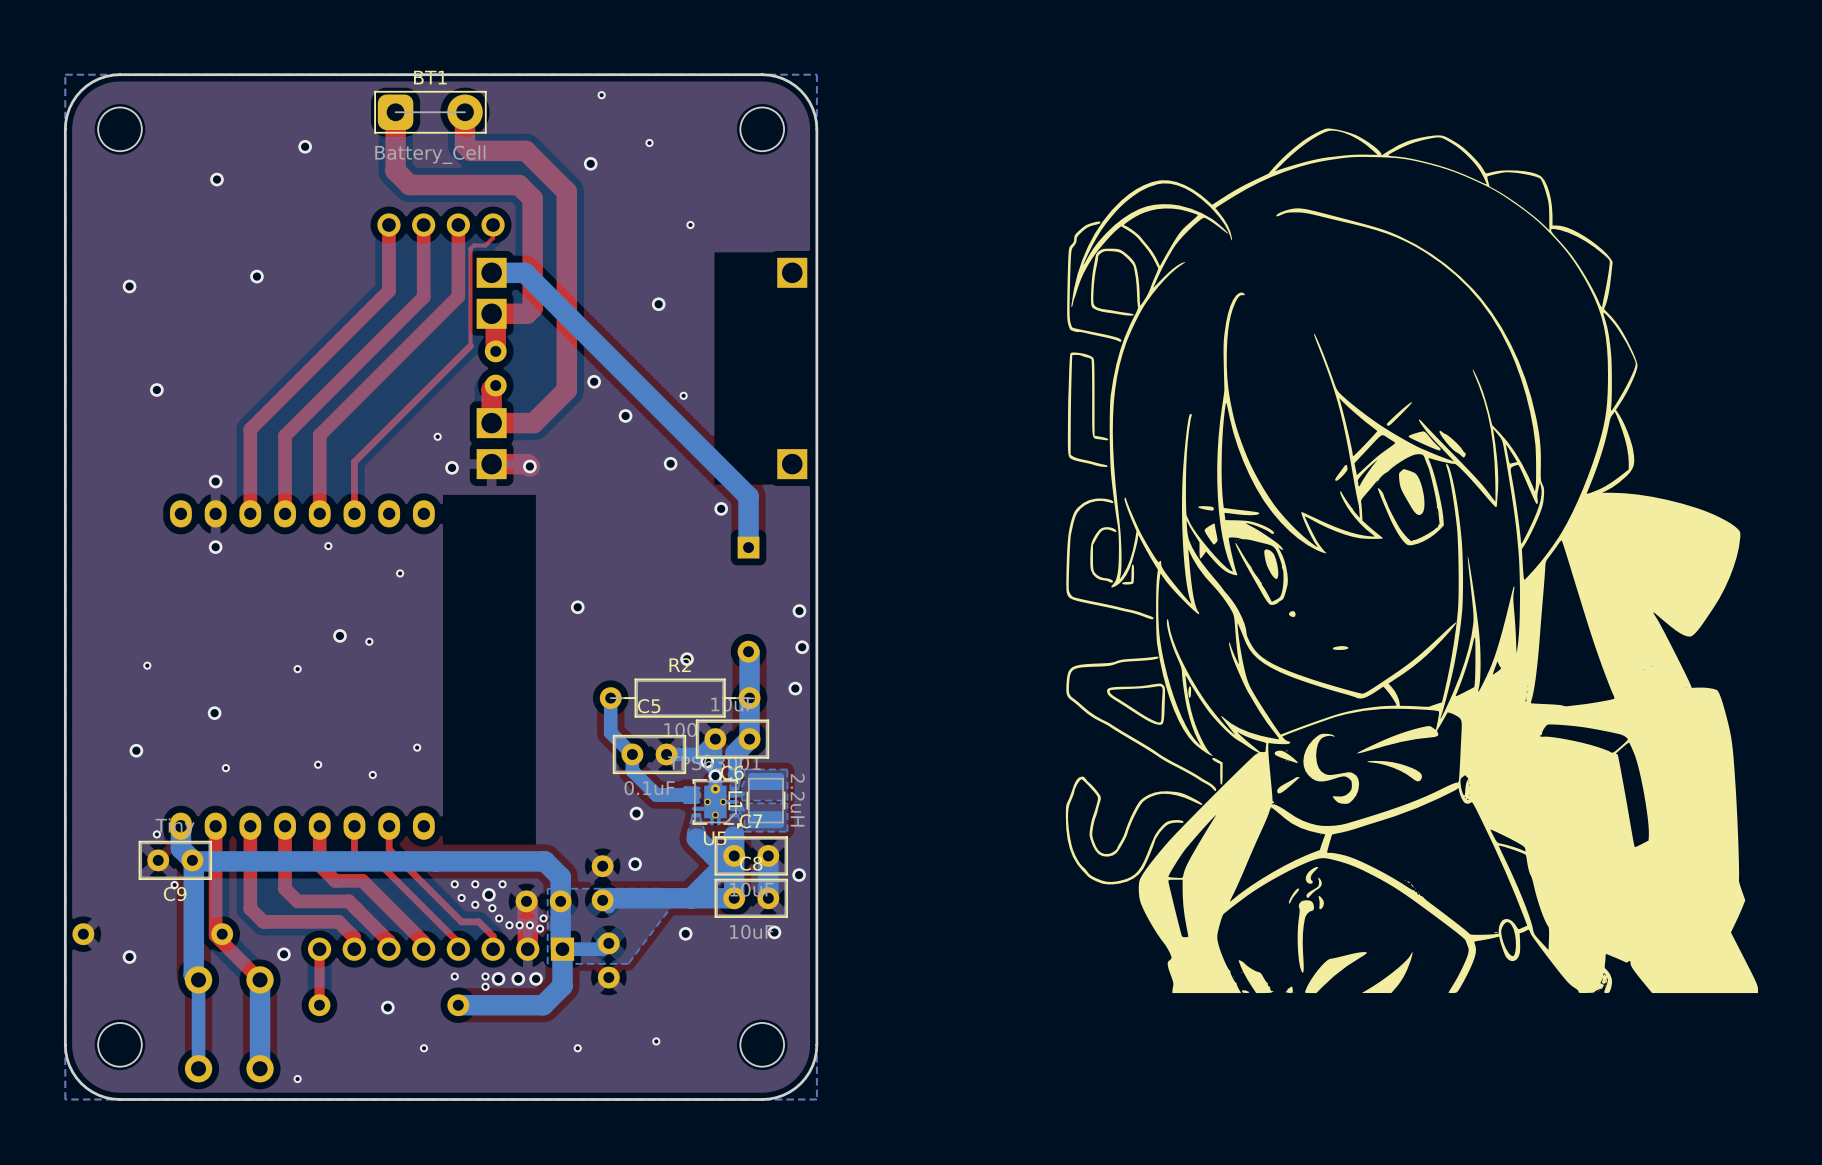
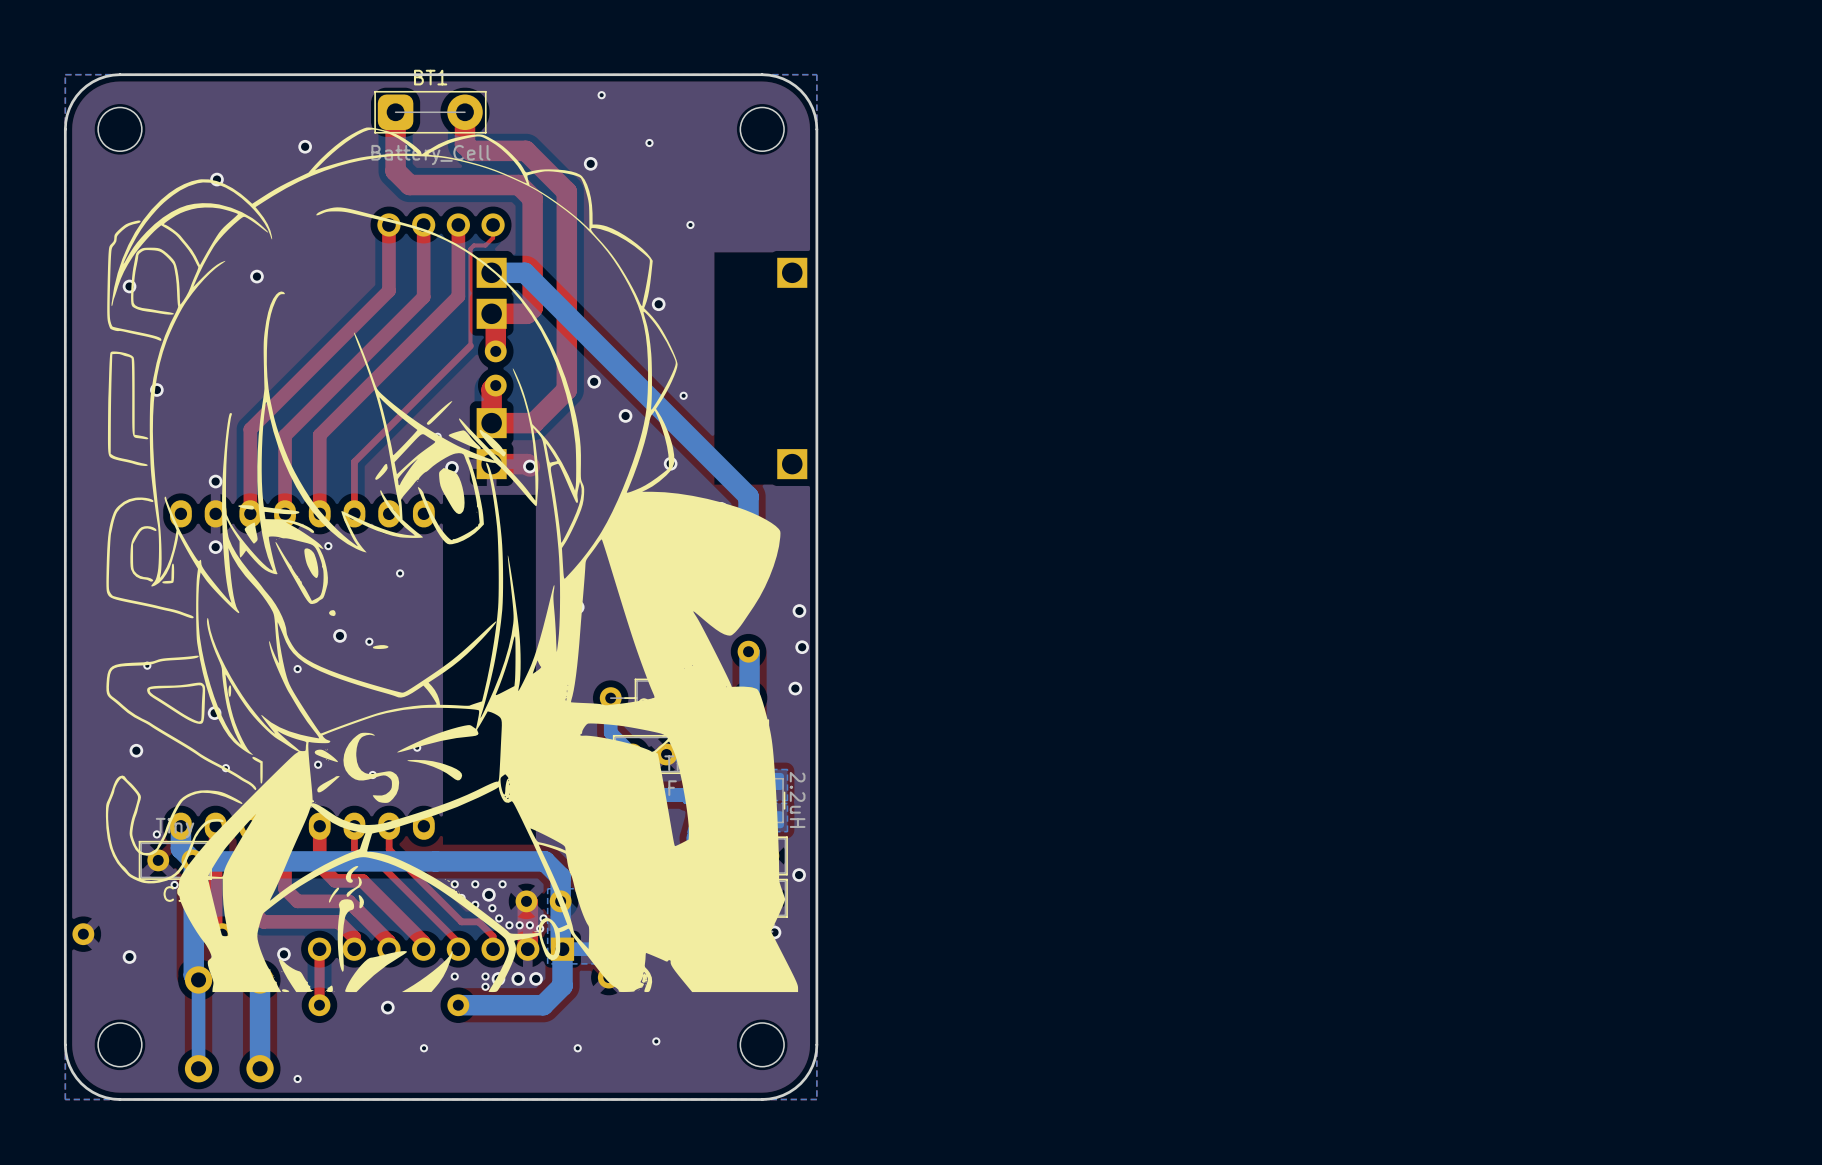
drawing: none -> [105, 127, 799, 993]
drawing: [1065, 128, 1758, 994] -> none

